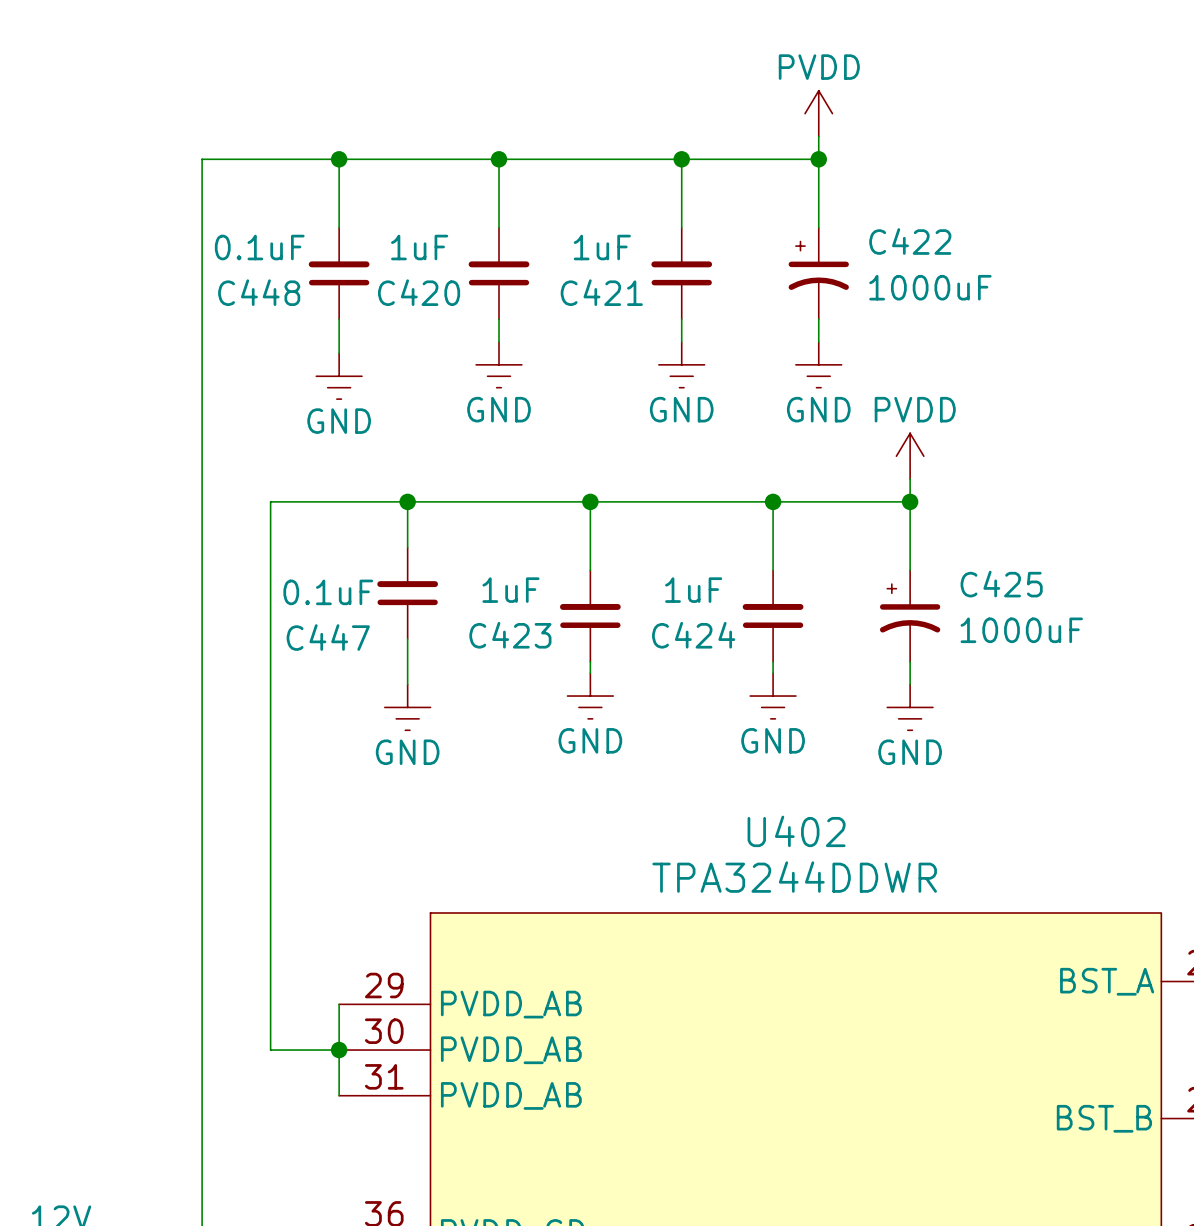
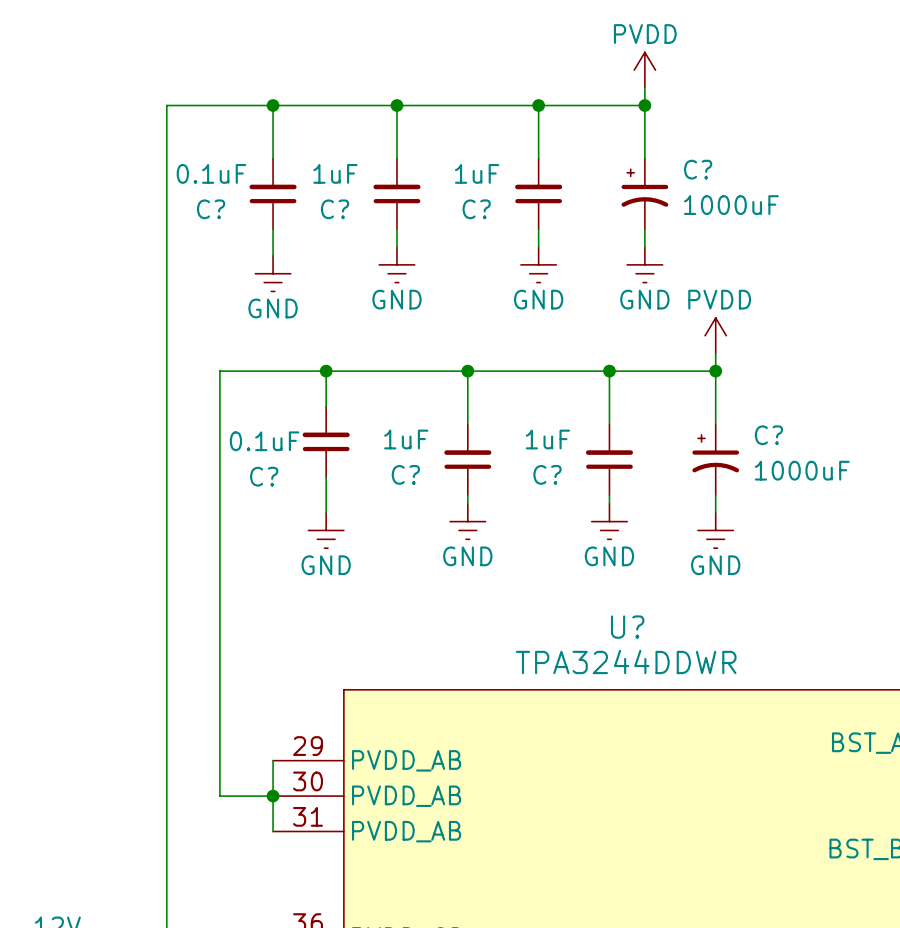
C422 name: C422 (910, 241) -> C? (698, 169)
C448 name: C448 (259, 292) -> C? (211, 209)
C420 name: C420 (419, 292) -> C? (335, 209)
C421 name: C421 (601, 292) -> C? (476, 209)
C425 name: C425 (1001, 584) -> C? (768, 435)
C423 name: C423 (510, 635) -> C? (405, 474)
C424 name: C424 (693, 635) -> C? (547, 474)
C447 name: C447 (328, 637) -> C? (264, 476)
U402 name: U402 (796, 831) -> U? (627, 627)

